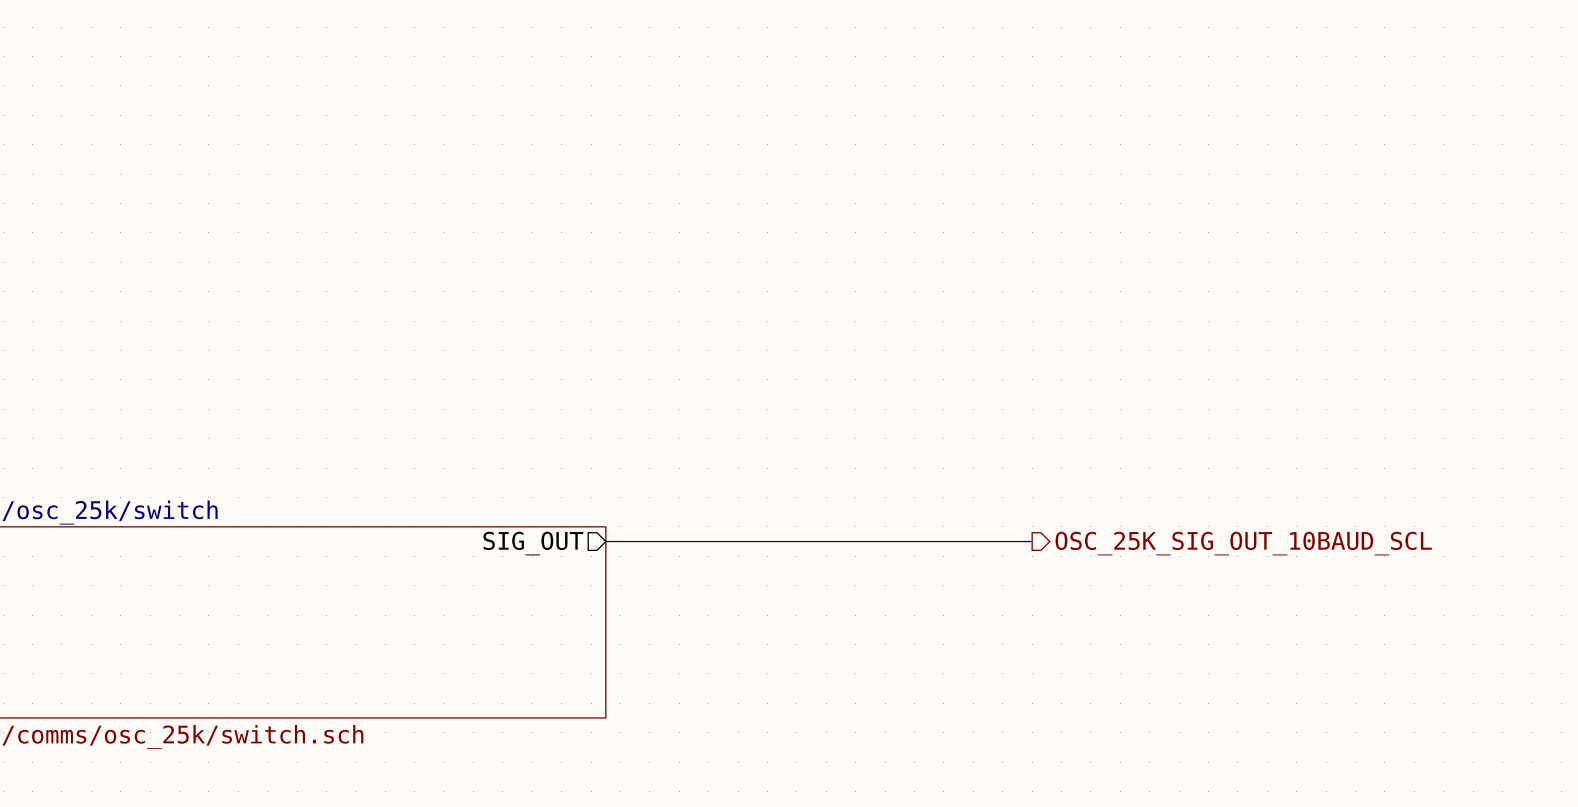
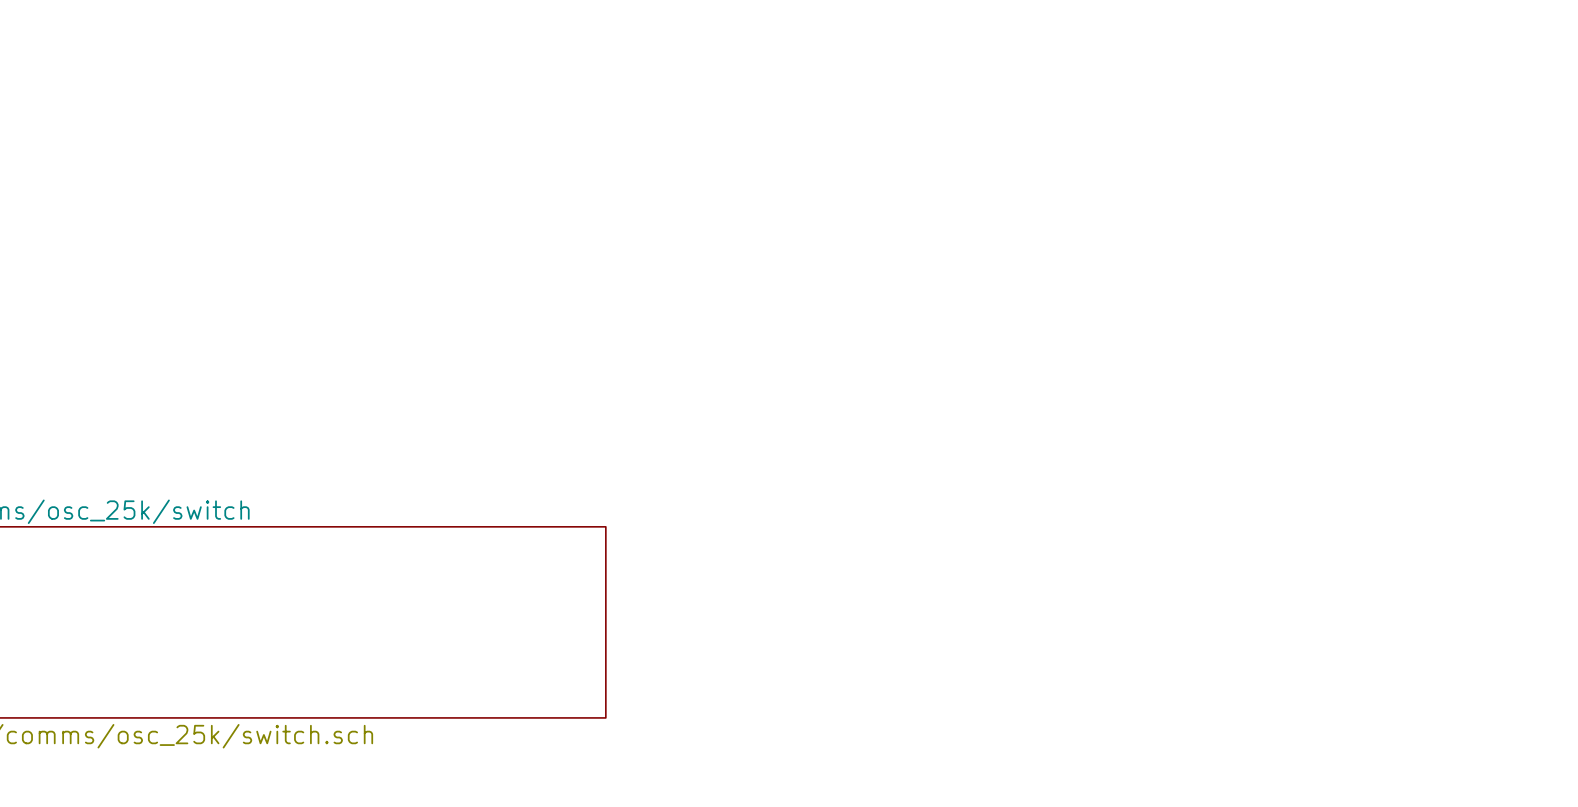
wire: (605, 541) (1032, 541) -> none
sheet pin: SIG_OUT (533, 543) -> none
hierarchical label: OSC_25K_SIG_OUT_10BAUD_SCL (1243, 543) -> none

